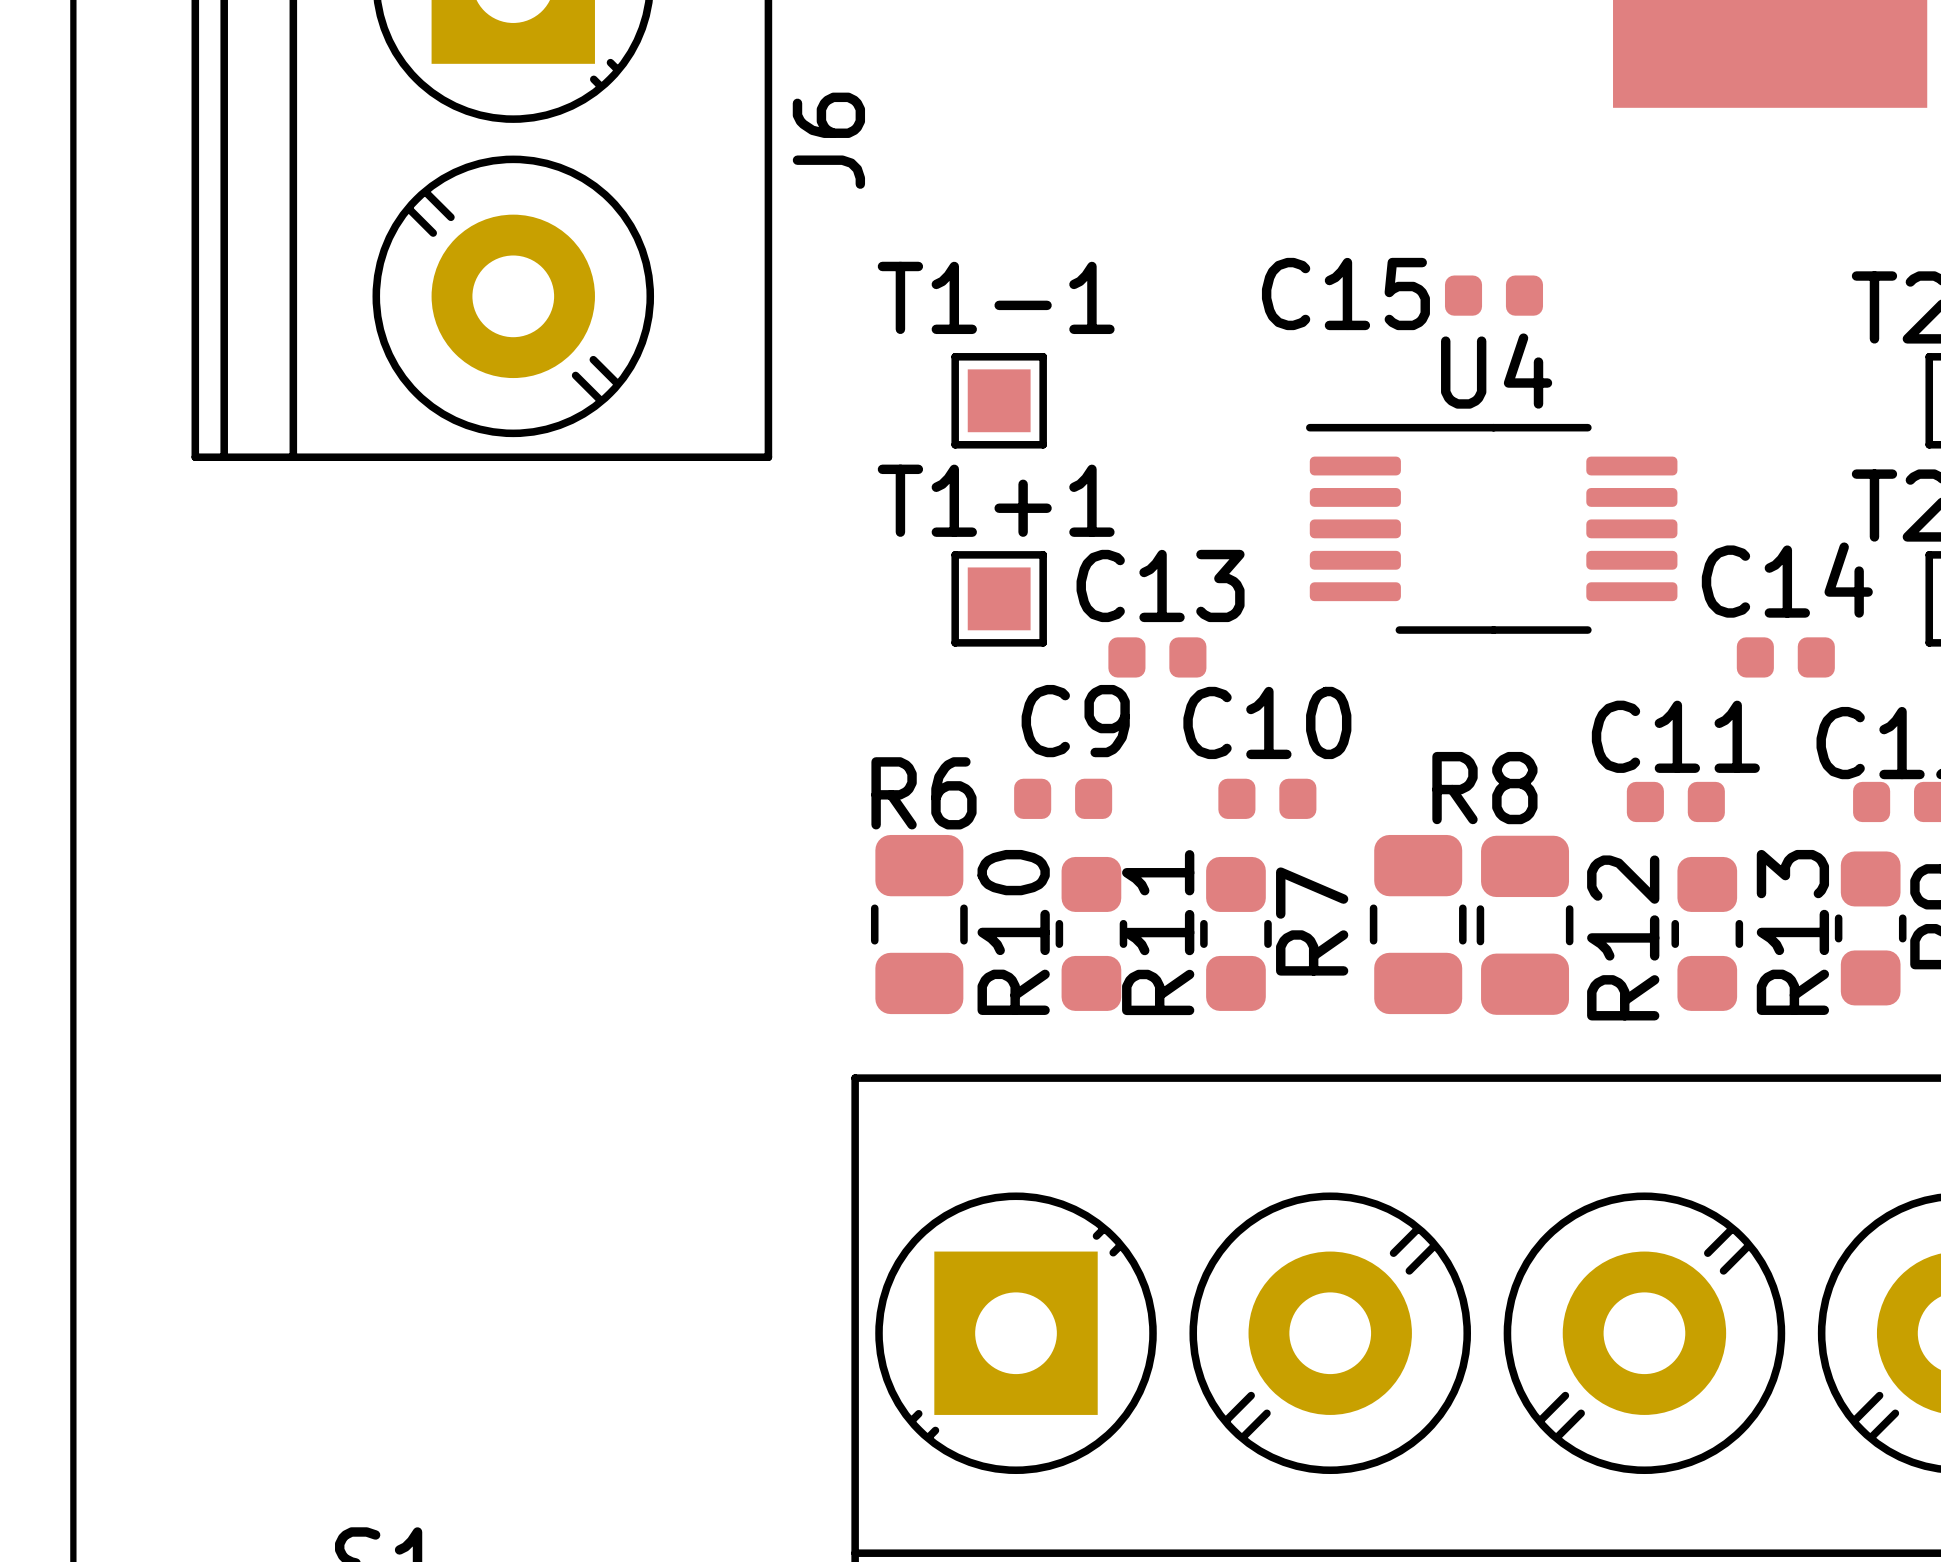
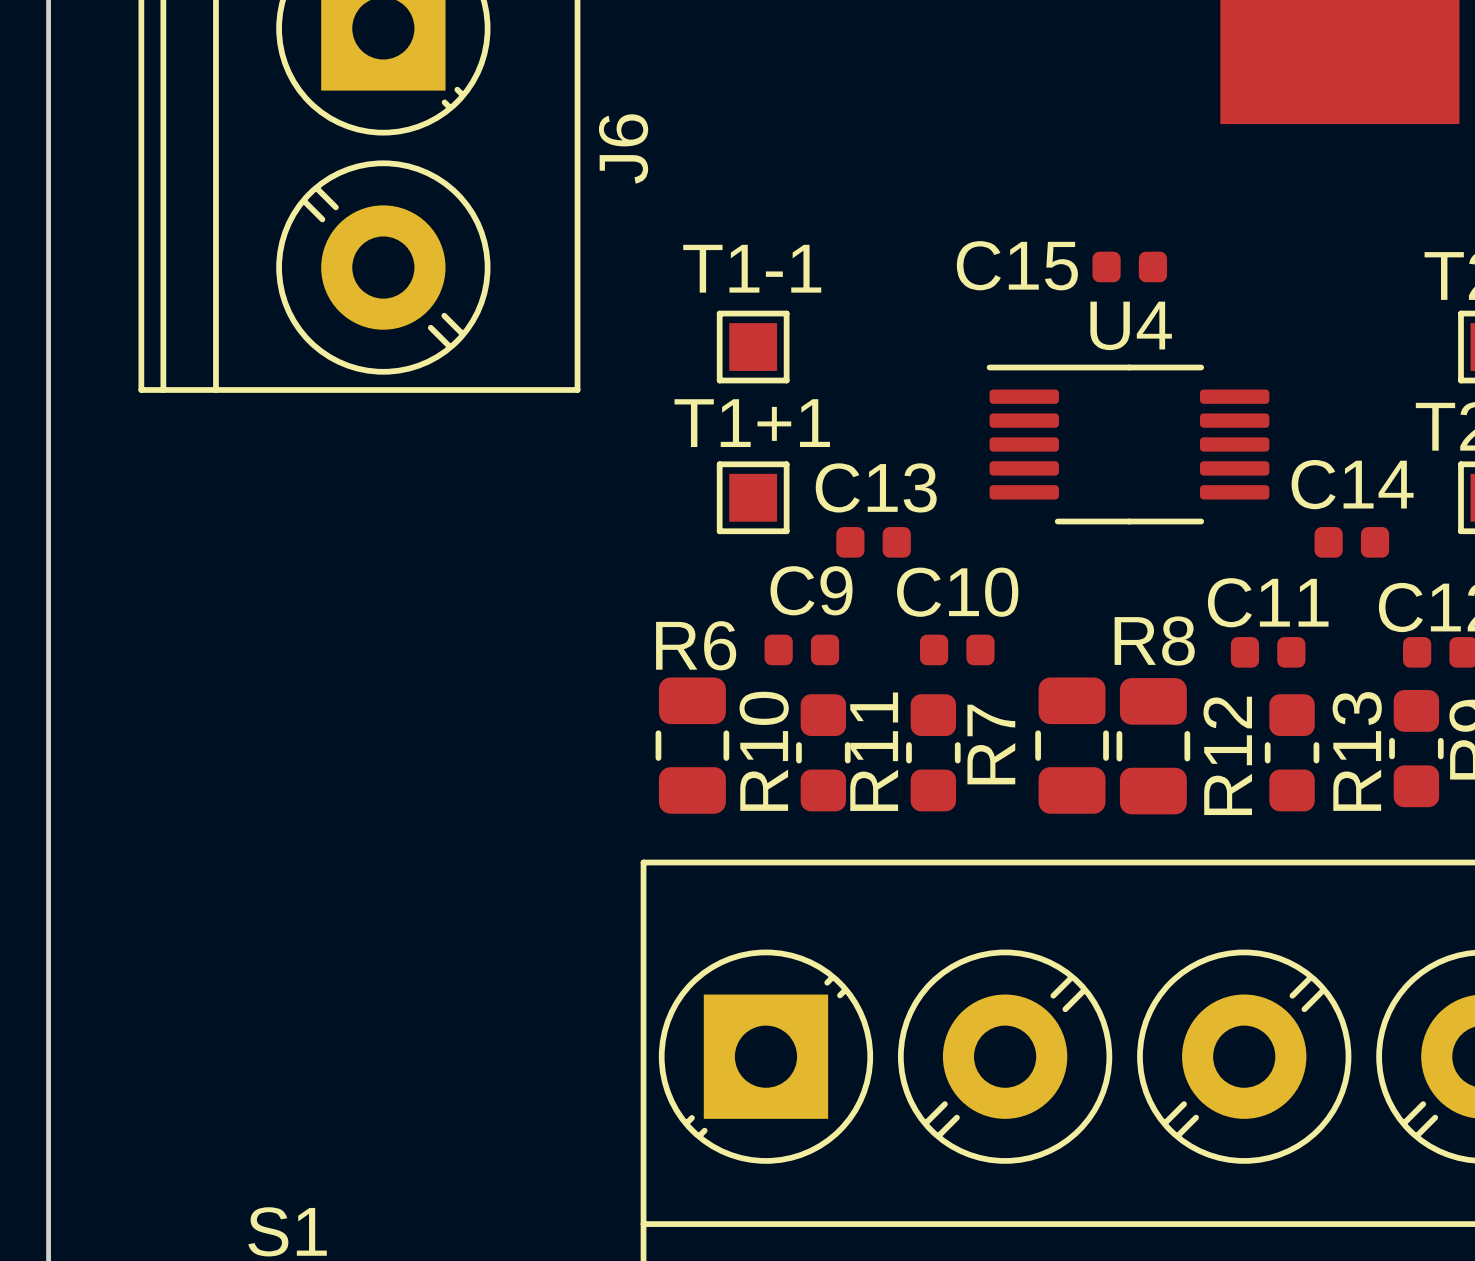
R8 name position: R8 (1484, 788) -> R8 (1154, 640)

